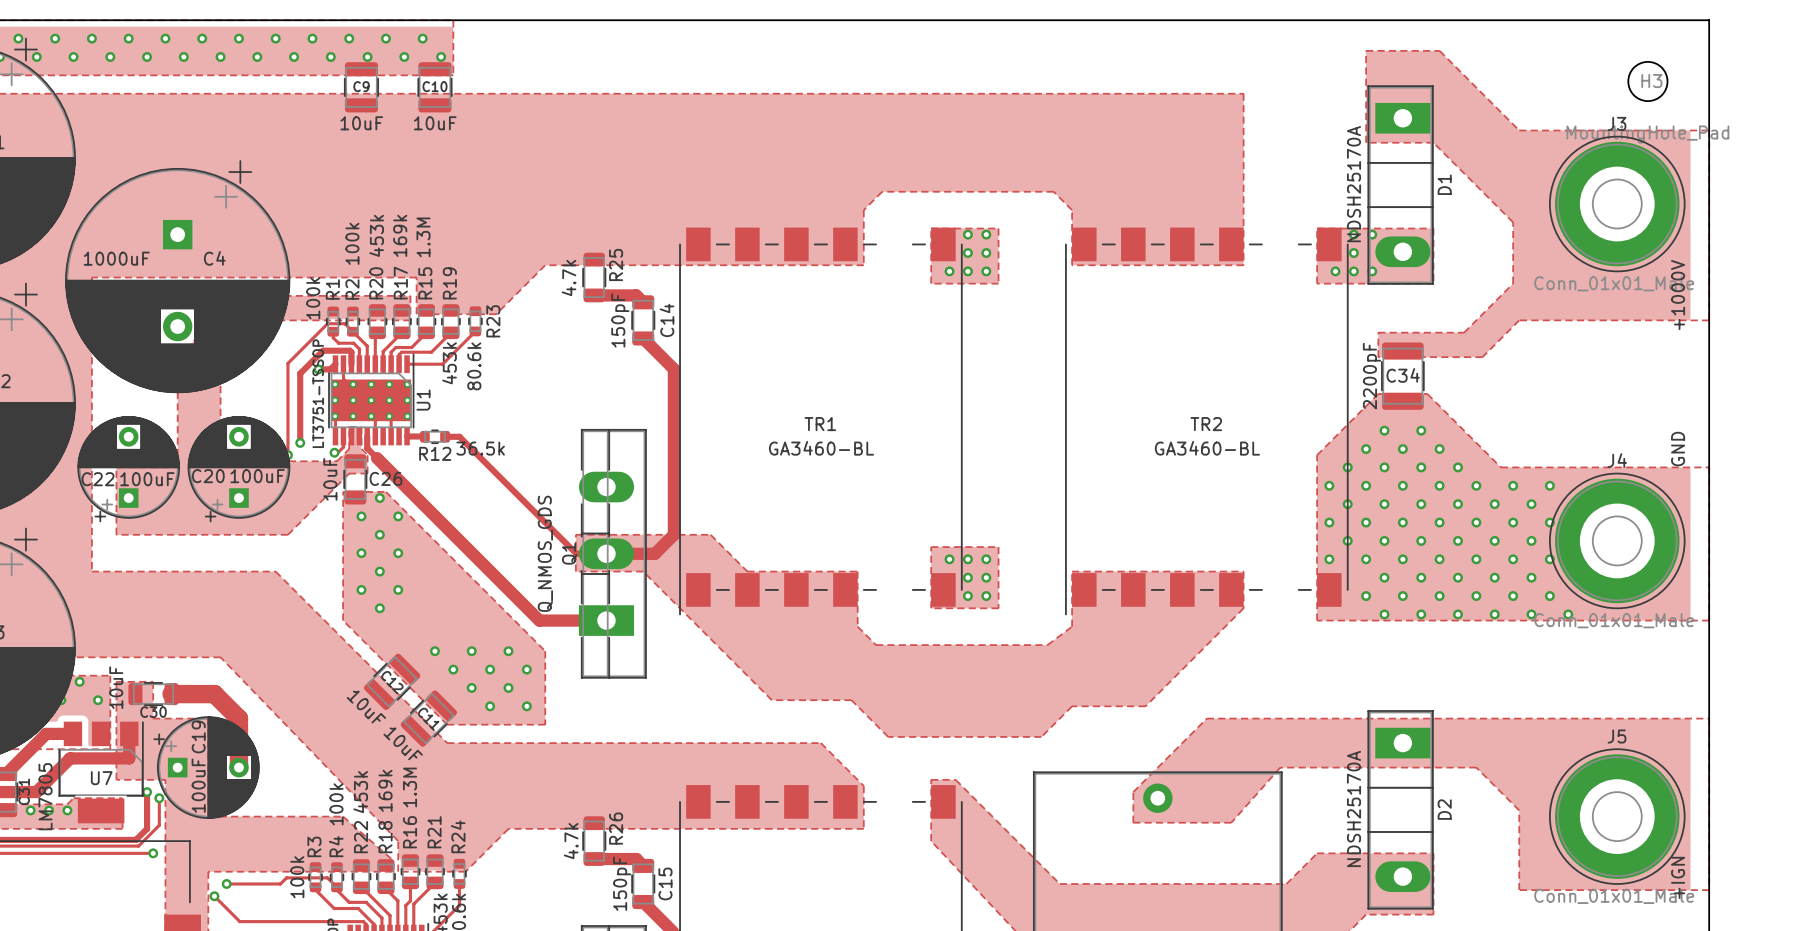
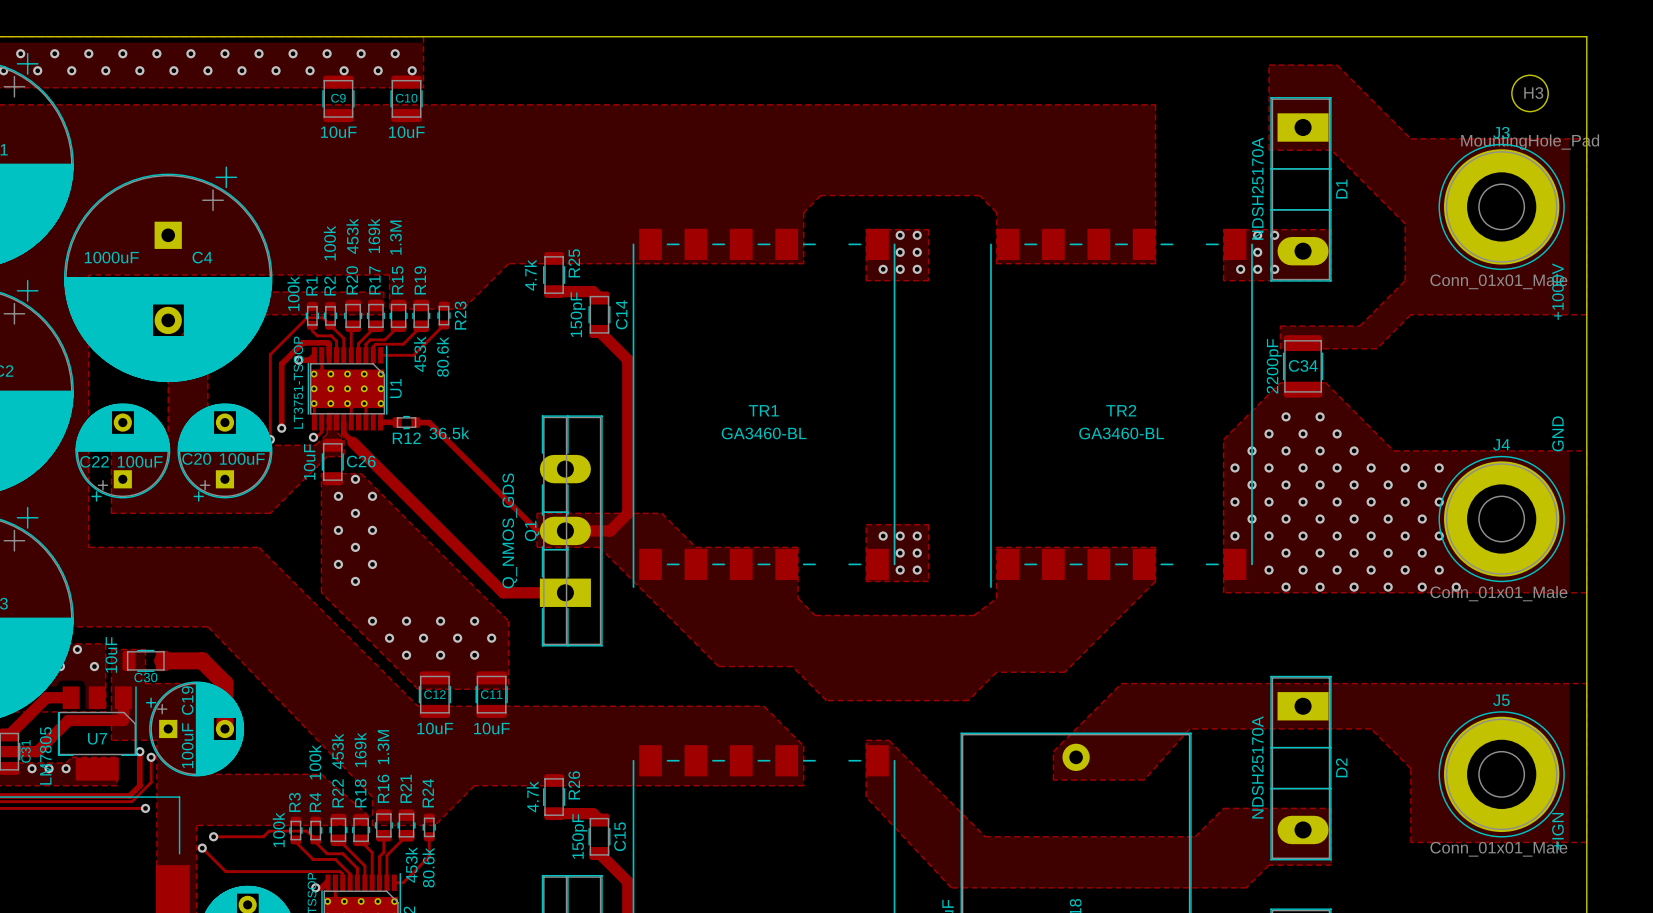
via: none -> (372, 621)
via: none -> (389, 638)
C12 rotation: 0° (392, 681) -> 45° counterclockwise (434, 694)
C12 position: (392, 681) -> (434, 694)
via: none -> (406, 655)
via: (490, 706) -> none
via: (526, 706) -> none
C11 rotation: 0° (428, 718) -> 45° counterclockwise (491, 694)
C11 position: (428, 718) -> (491, 694)

